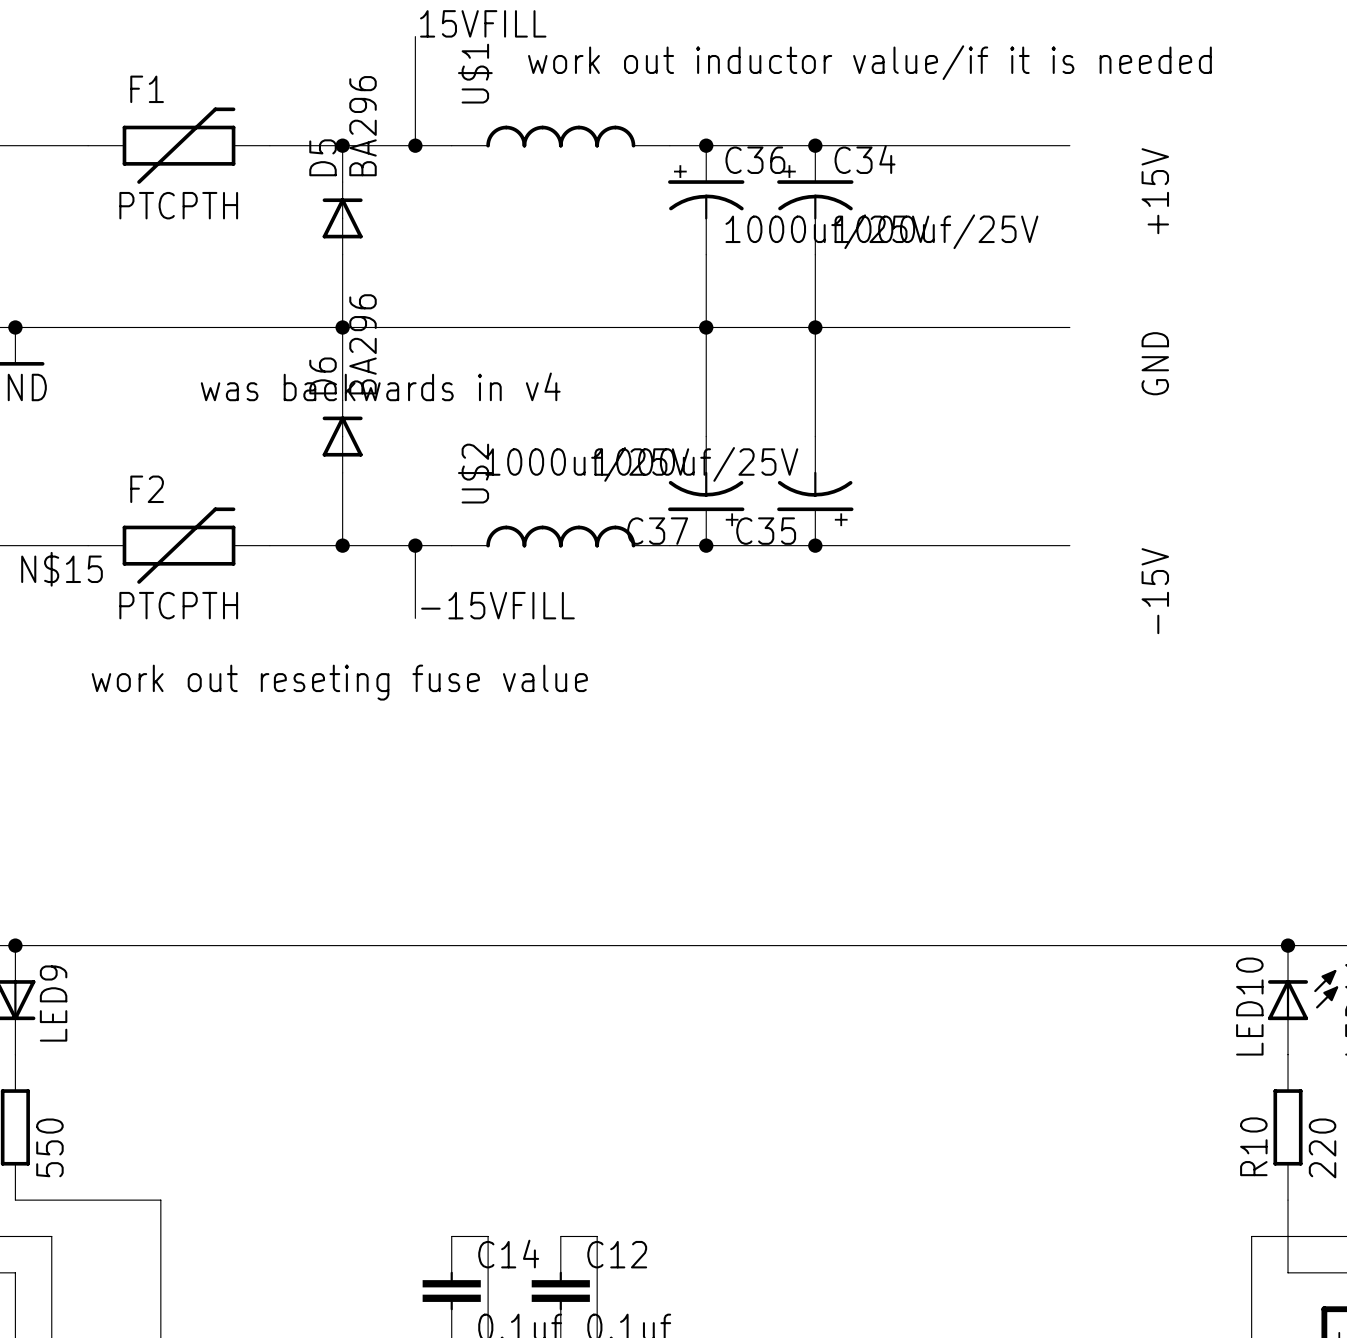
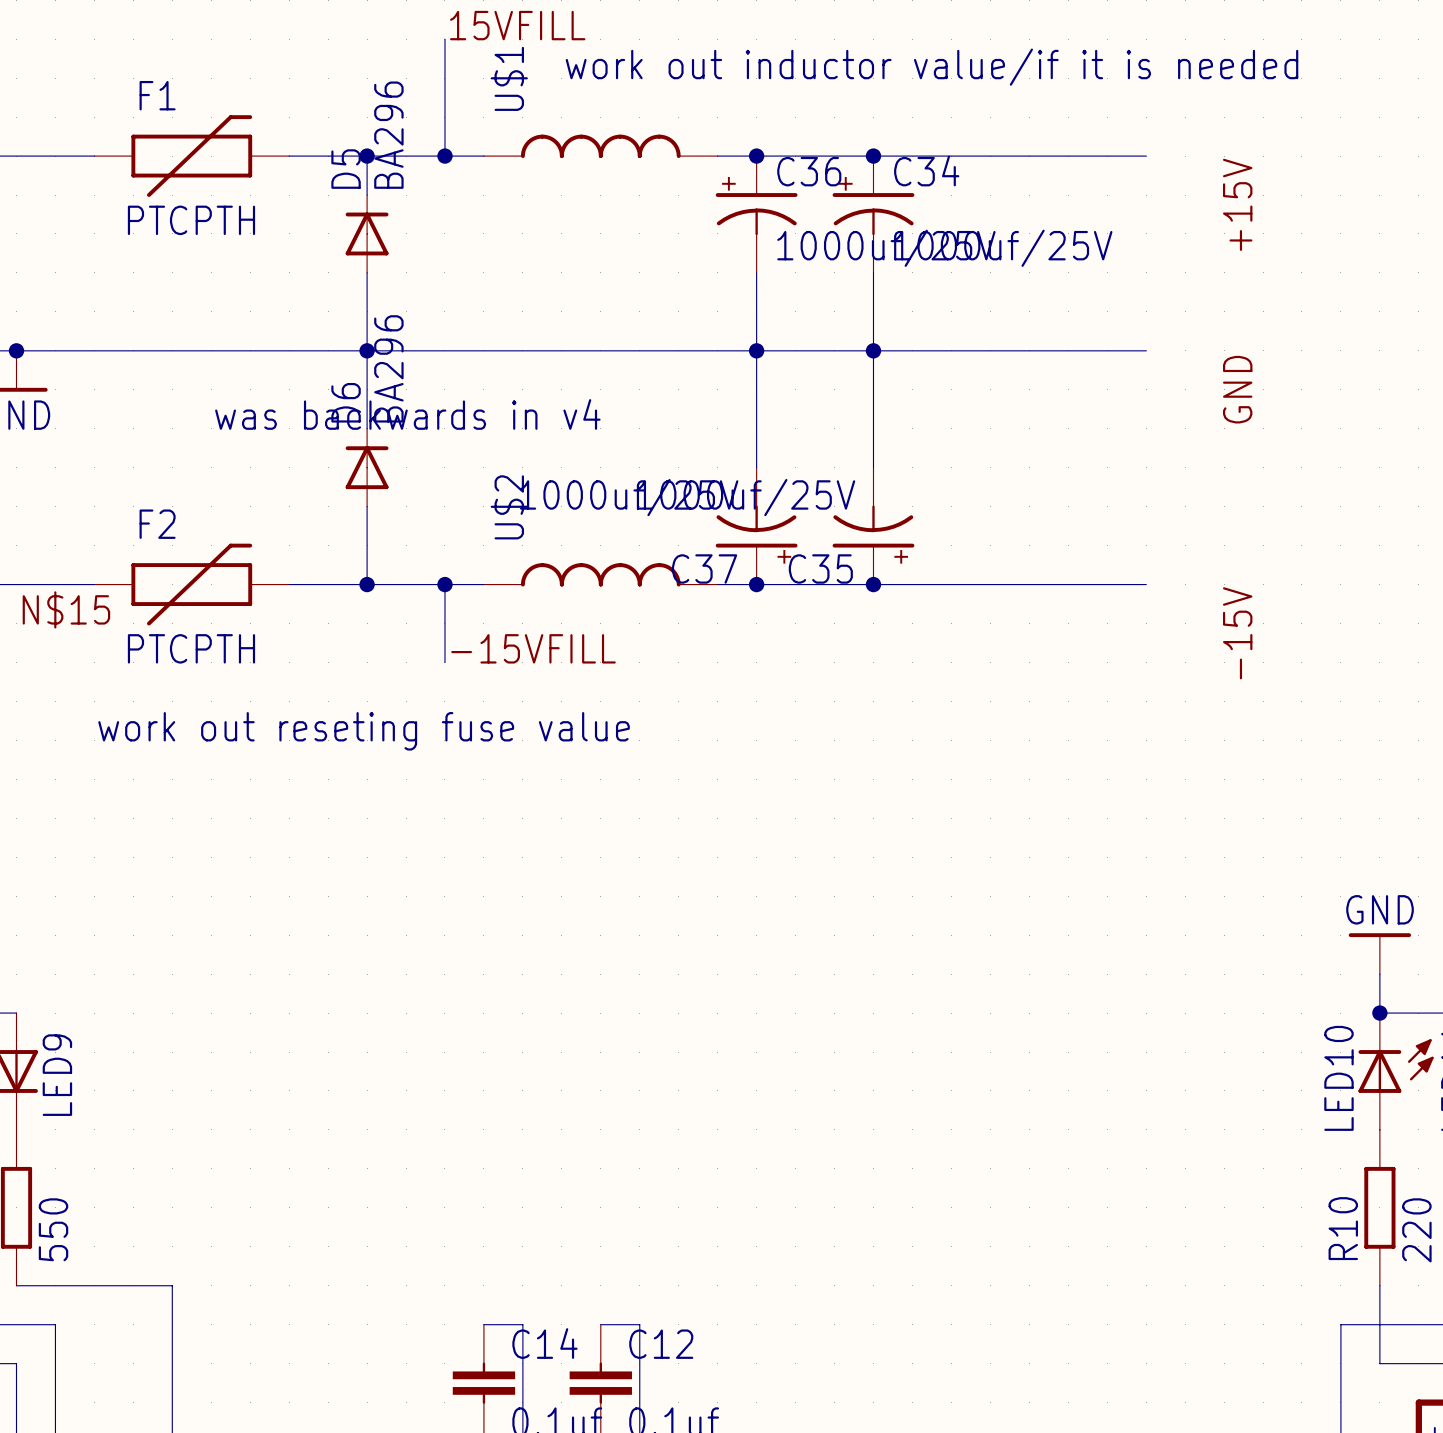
power symbol: none -> GND (1379, 953)
wire: (15, 945) (1288, 945) -> (1379, 974) (1379, 1013)
junction: (15, 945) -> none

